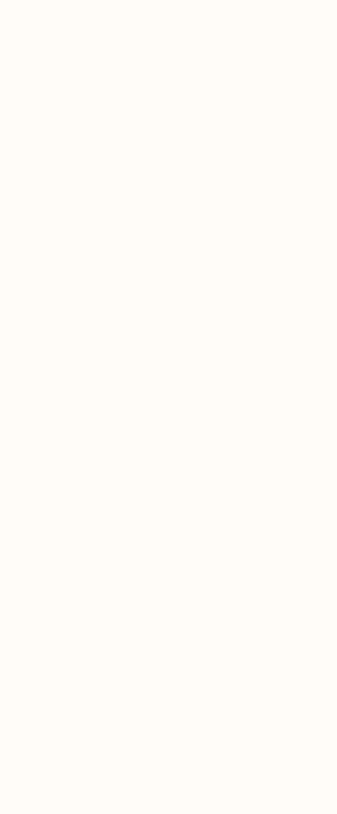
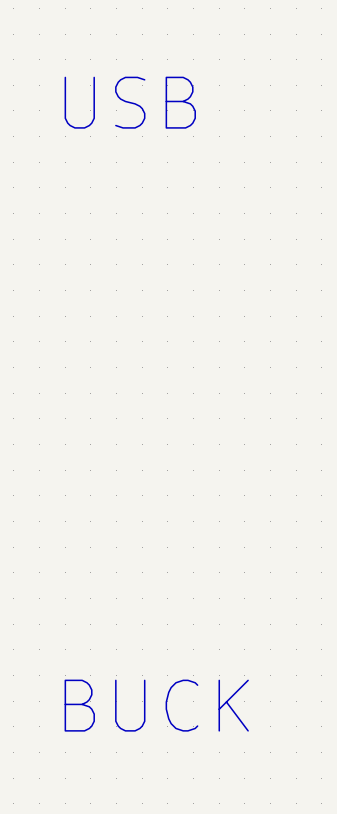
text: none -> USB (130, 102)
text: none -> BUCK (156, 705)

